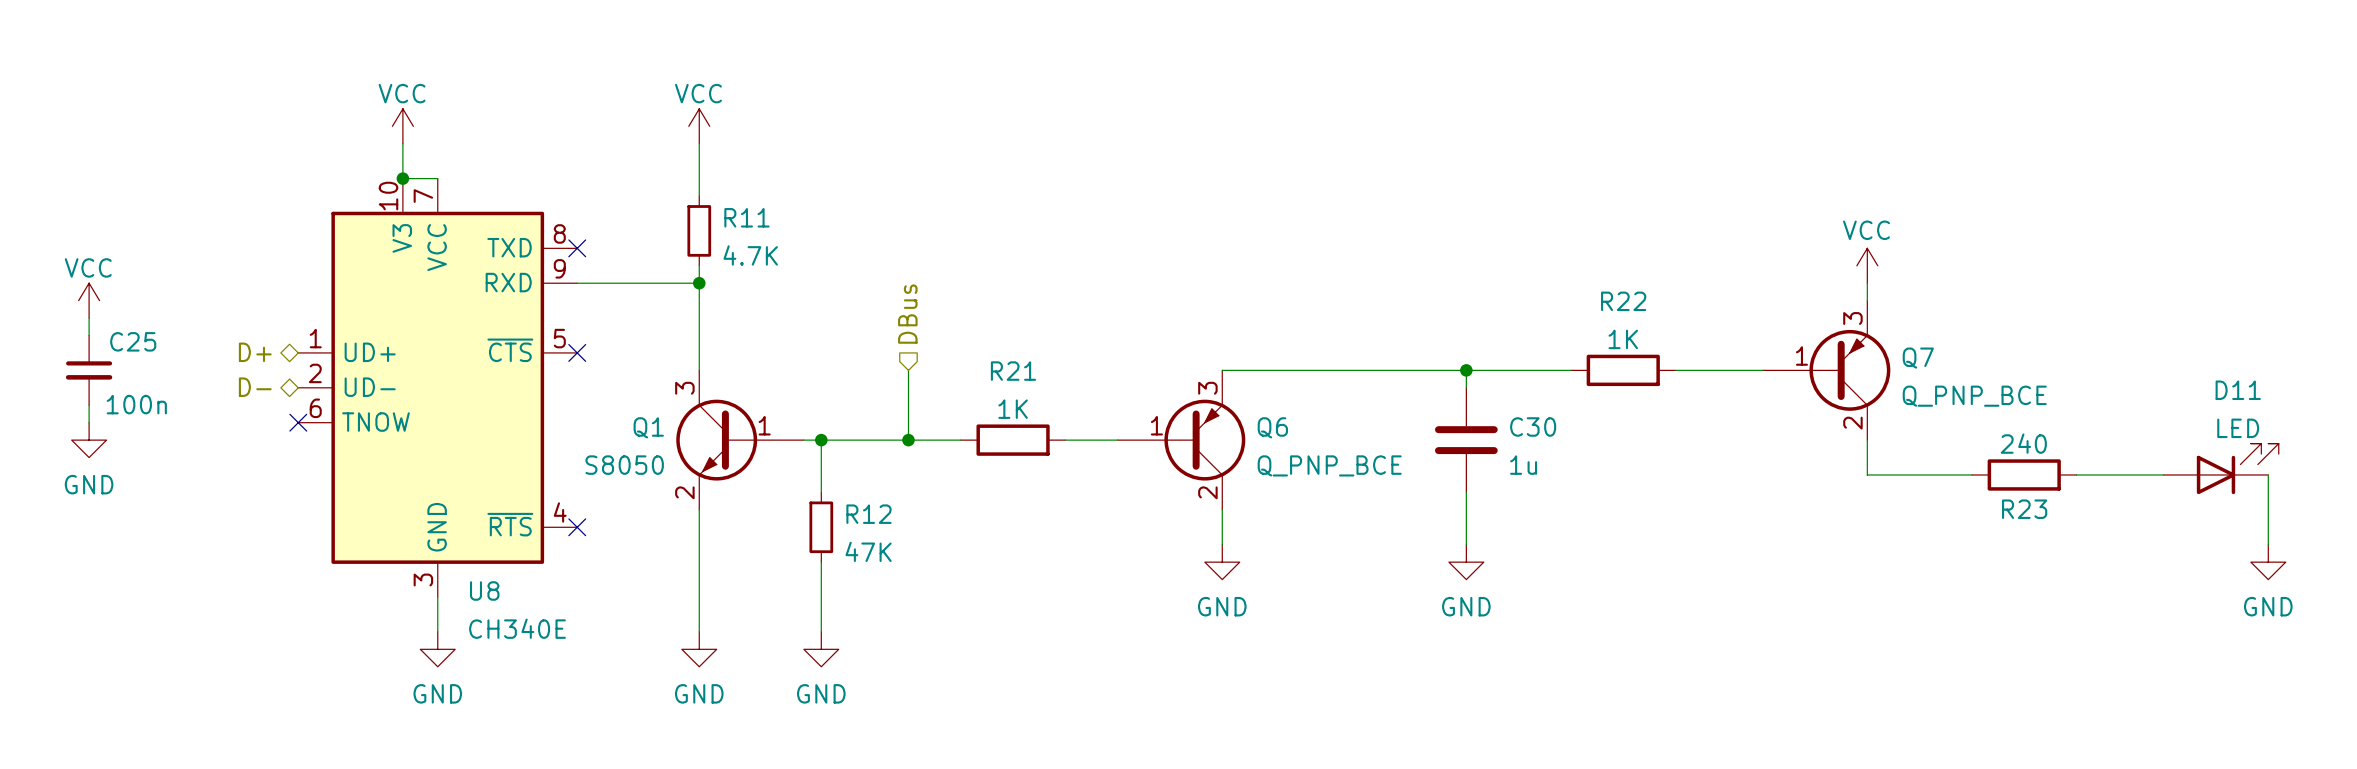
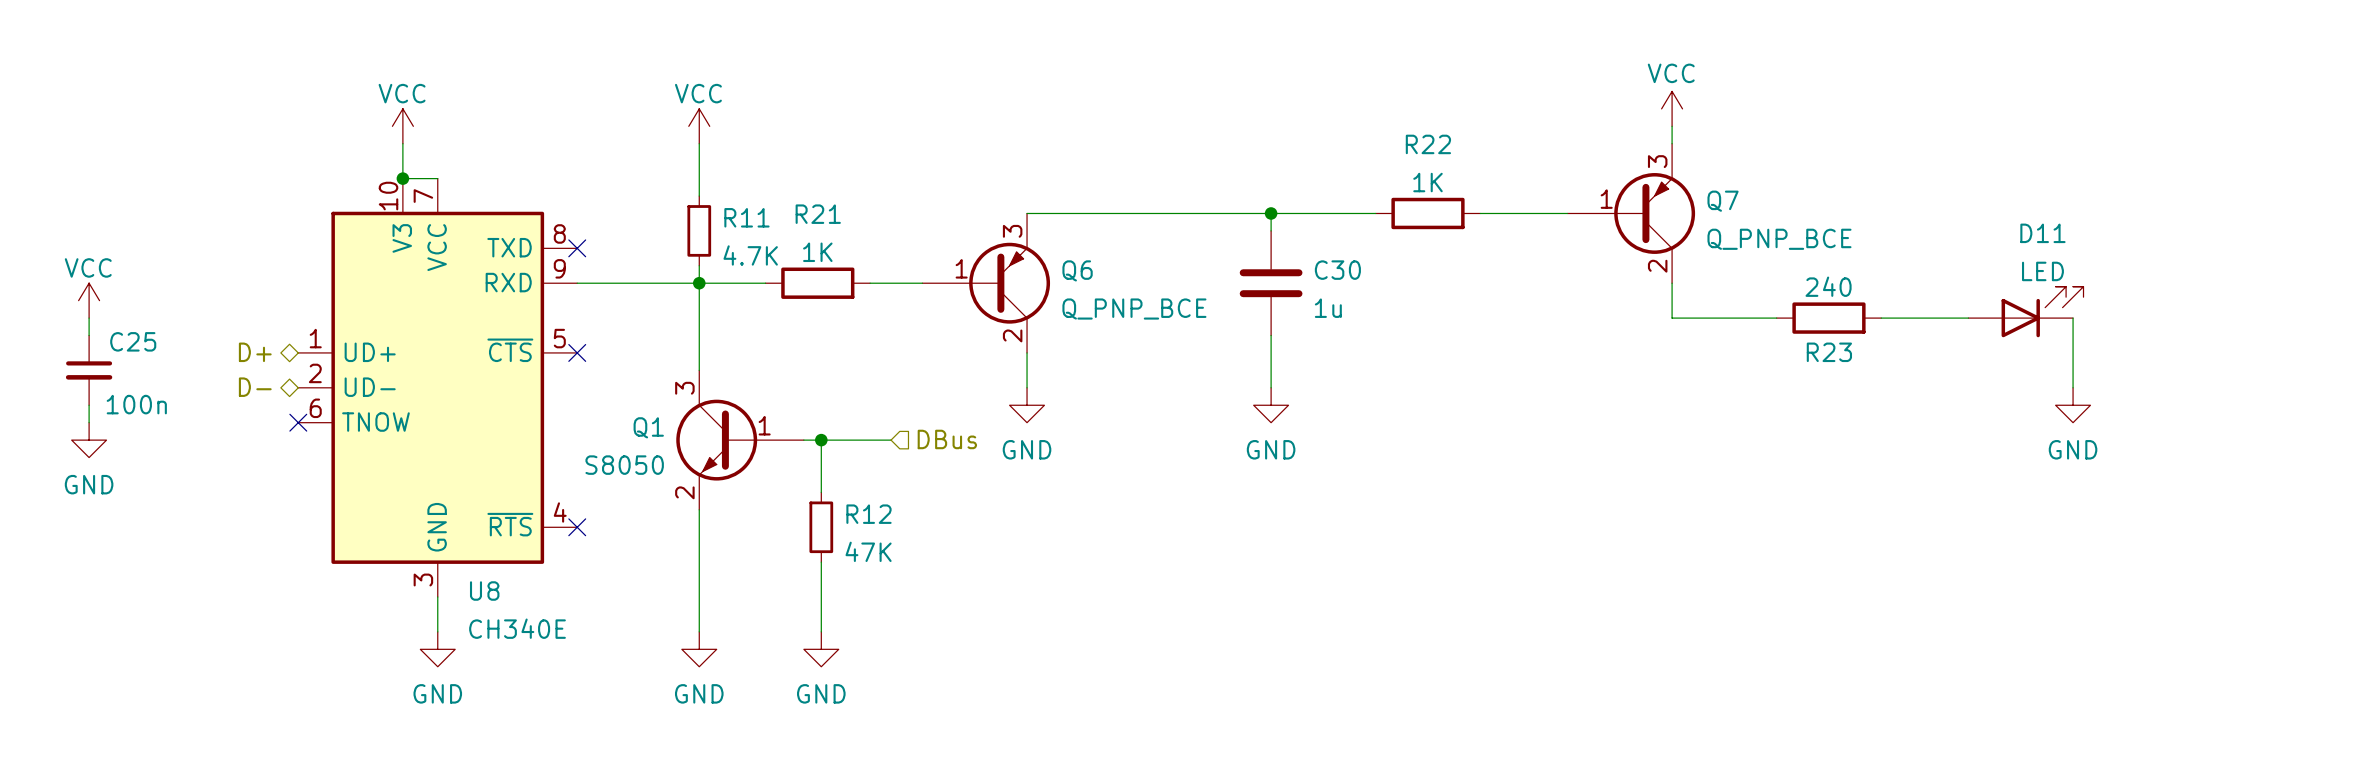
junction: none -> (1271, 213)
power symbol position: VCC (1867, 265) -> VCC (1672, 108)
wire: none -> (699, 283) (765, 283)
wire: (1867, 283) (1867, 300) -> (1672, 126) (1672, 143)
hierarchical label rotation: 0° (907, 314) -> 90° clockwise (947, 439)
hierarchical label position: DBus (907, 314) -> DBus (947, 439)
wire: (908, 370) (908, 440) -> none
wire: (1222, 370) (1570, 370) -> (1027, 213) (1375, 213)
wire: (1466, 370) (1466, 387) -> (1271, 213) (1271, 230)
junction: (1466, 370) -> none
R22 position: (1623, 370) -> (1428, 213)
wire: (1675, 370) (1762, 370) -> (1480, 213) (1567, 213)
Q7 position: (1826, 370) -> (1631, 213)
power symbol: none -> GND (1027, 405)
power symbol: none -> GND (1271, 405)
wire: (891, 440) (960, 440) -> none
junction: (908, 440) -> none
R21 position: (1013, 440) -> (817, 283)
wire: (1065, 440) (1117, 440) -> (870, 283) (922, 283)
Q6 position: (1181, 440) -> (986, 283)
C30 position: (1466, 440) -> (1271, 283)
wire: (1867, 440) (1867, 474) (1971, 474) -> (1672, 283) (1672, 318) (1776, 318)
D11 position: (2221, 468) -> (2025, 311)
R23 position: (2024, 474) -> (1828, 318)
wire: (2076, 474) (2163, 474) -> (1881, 318) (1968, 318)
wire: (2268, 474) (2268, 544) -> (2073, 318) (2073, 387)
wire: (1466, 492) (1466, 544) -> (1271, 335) (1271, 387)
wire: (1222, 509) (1222, 544) -> (1027, 352) (1027, 387)
power symbol: GND (1222, 562) -> none
power symbol: GND (1466, 562) -> none
power symbol position: GND (2268, 562) -> GND (2073, 405)

